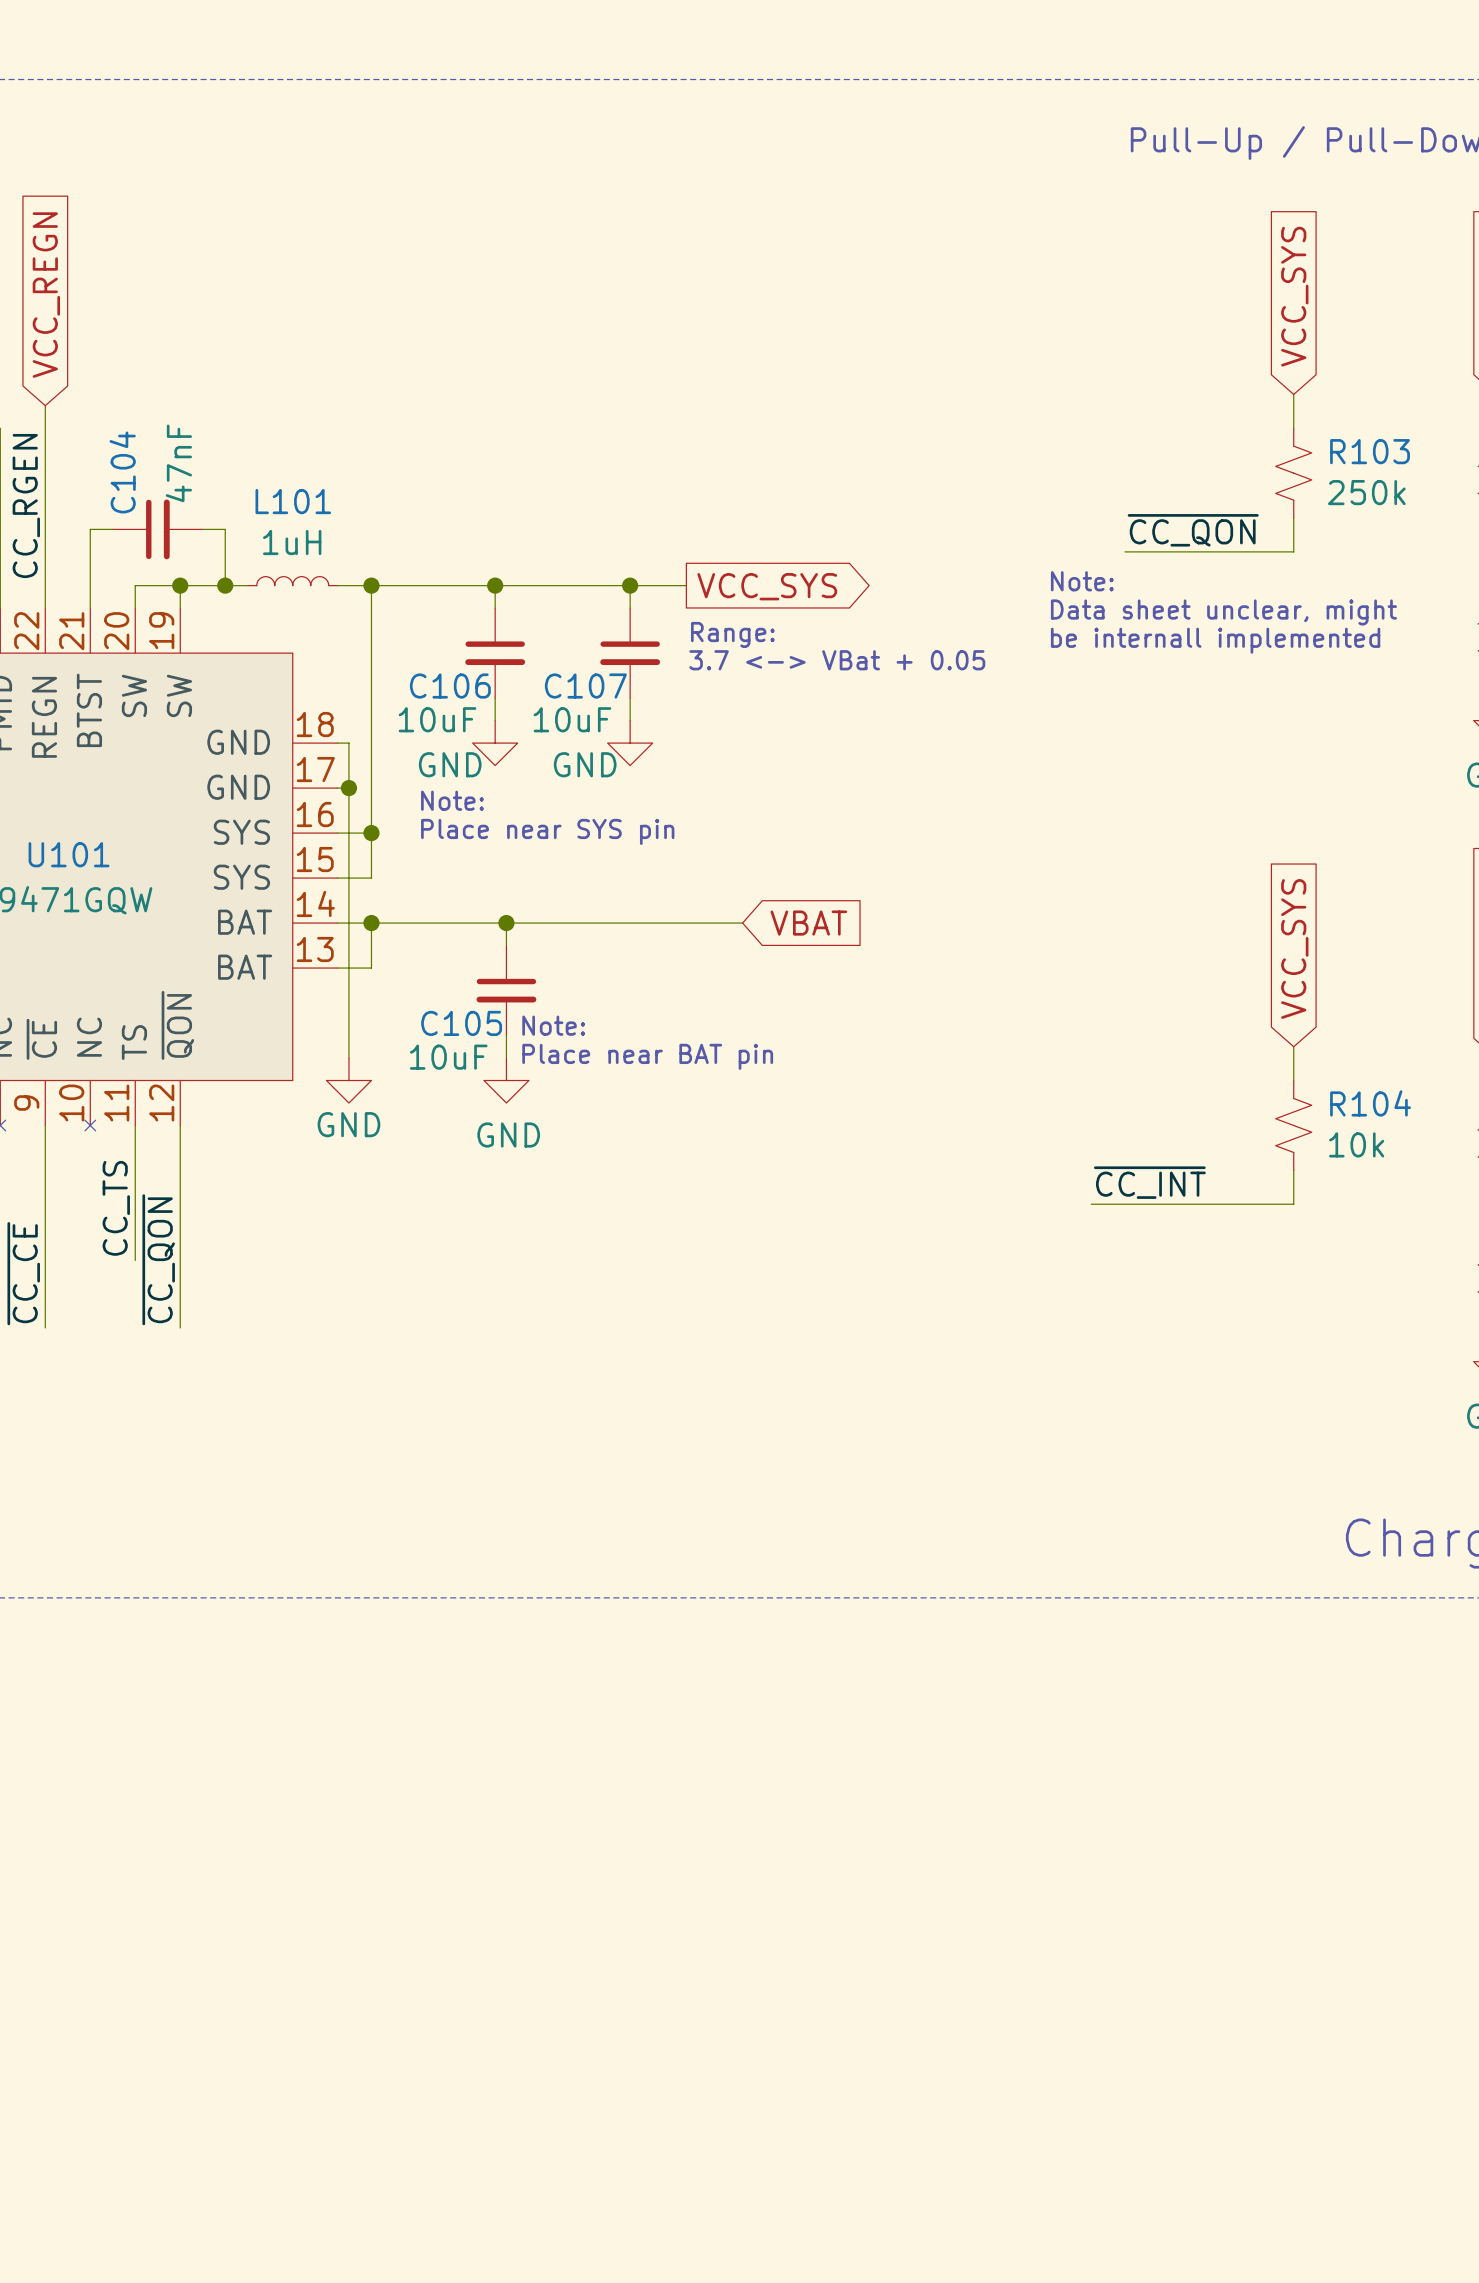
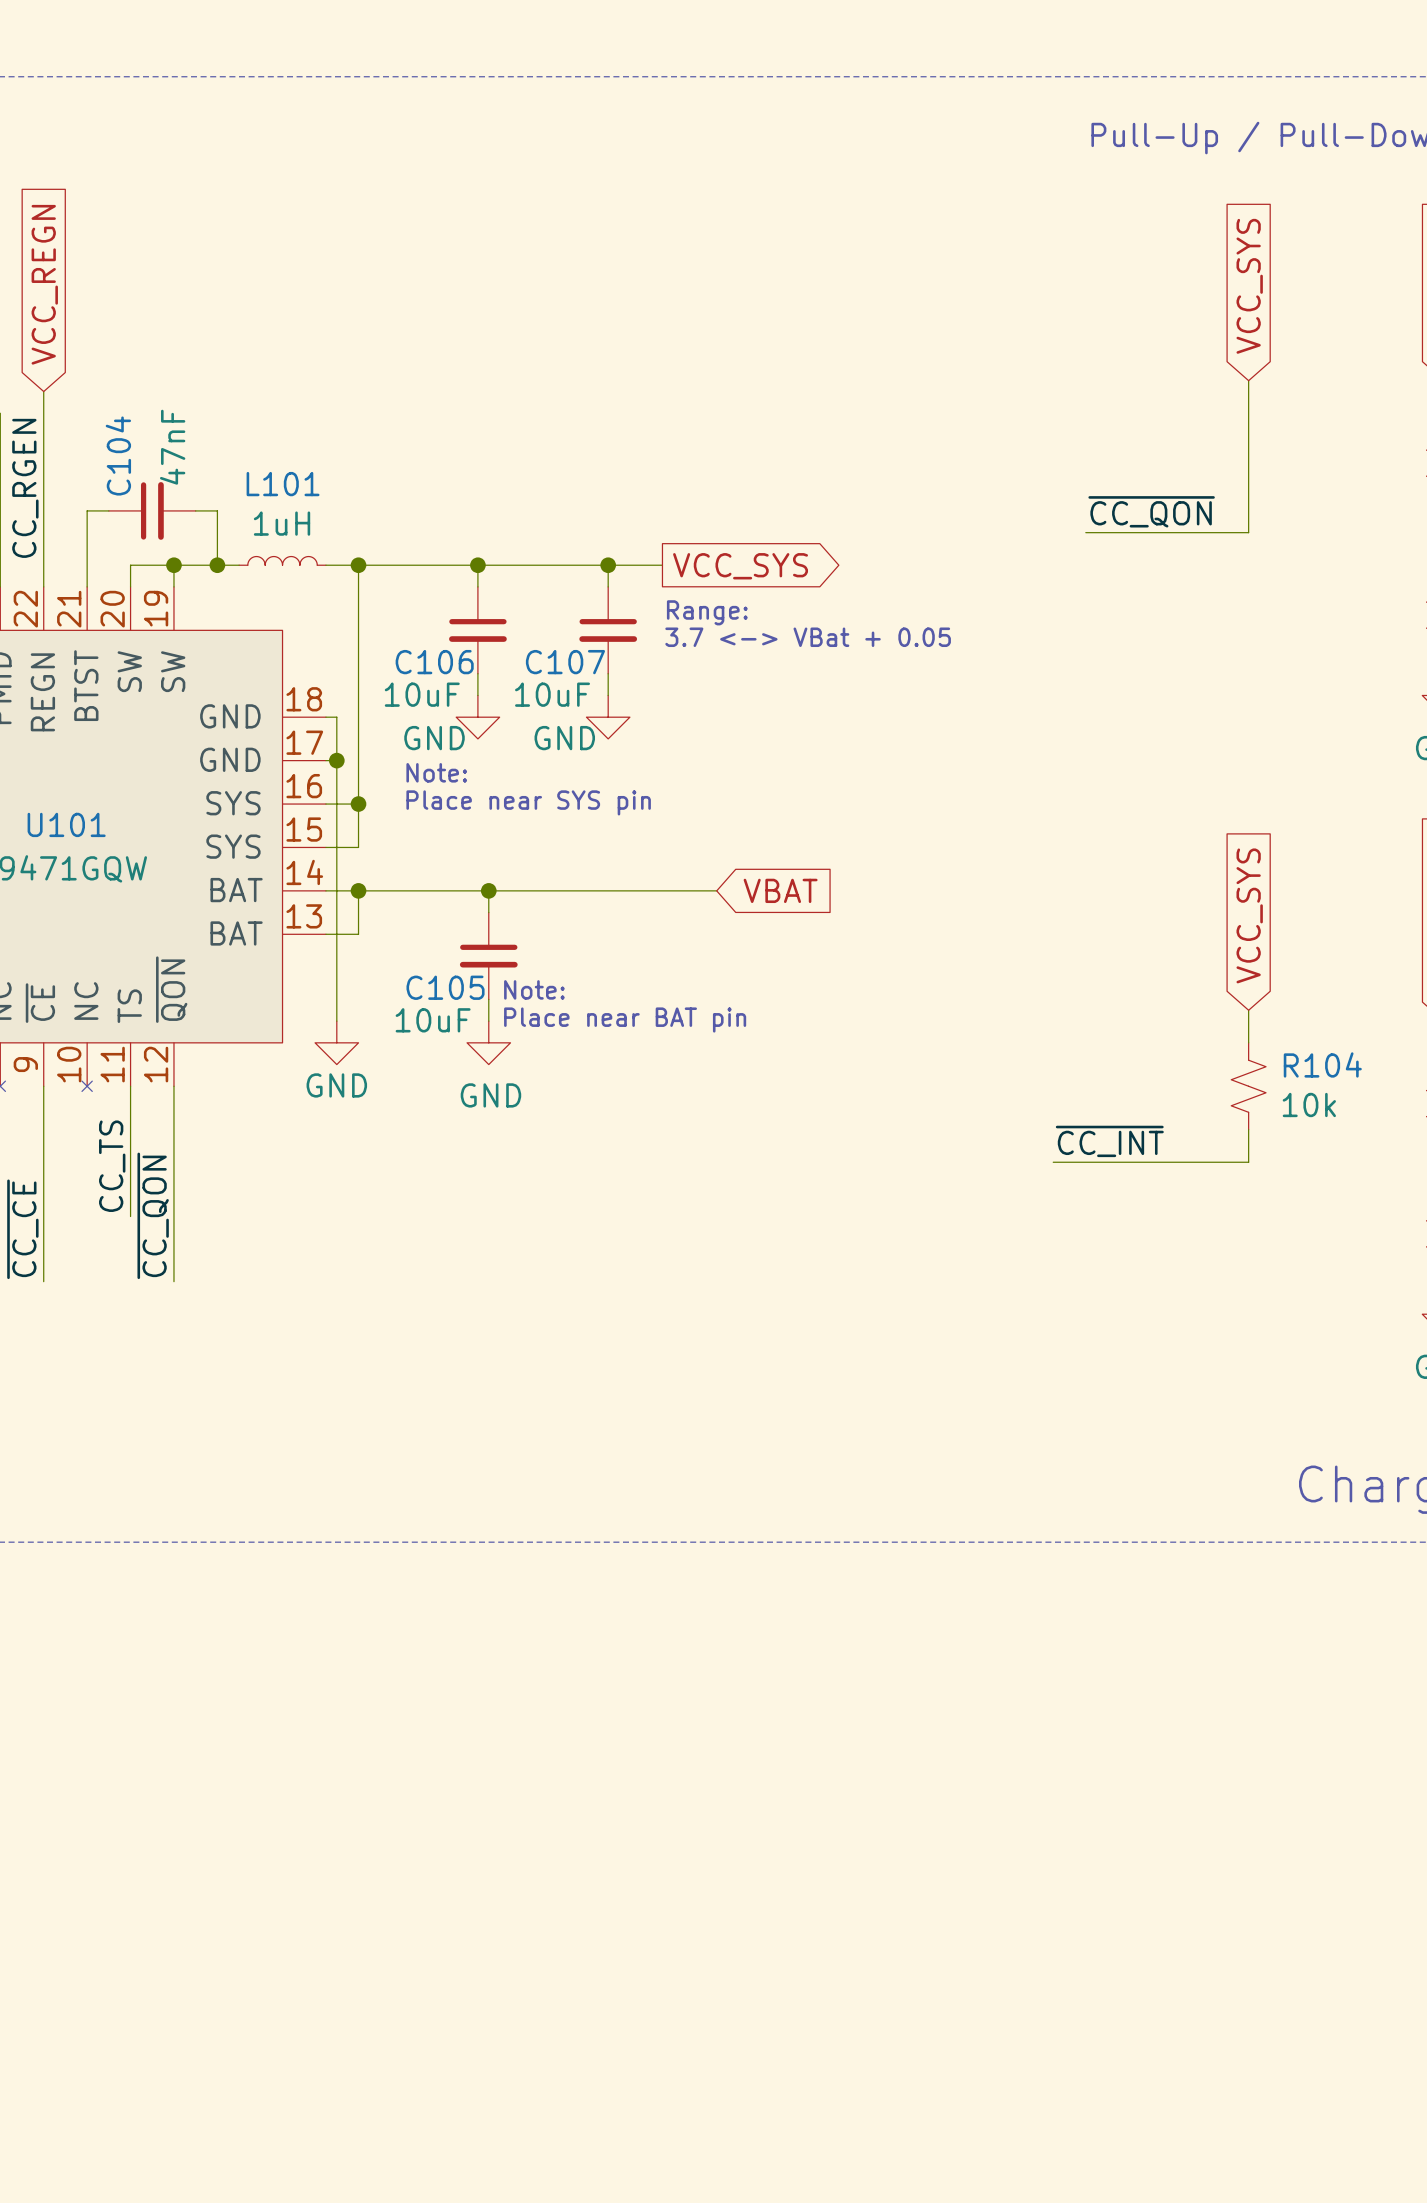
wire: none -> (1248, 413) (1248, 500)
R103: 250k (1293, 473) -> none
text: Note: (1082, 581) -> none
text: Data sheet unclear, might (1223, 612) -> none
text: be internall implemented (1215, 640) -> none

